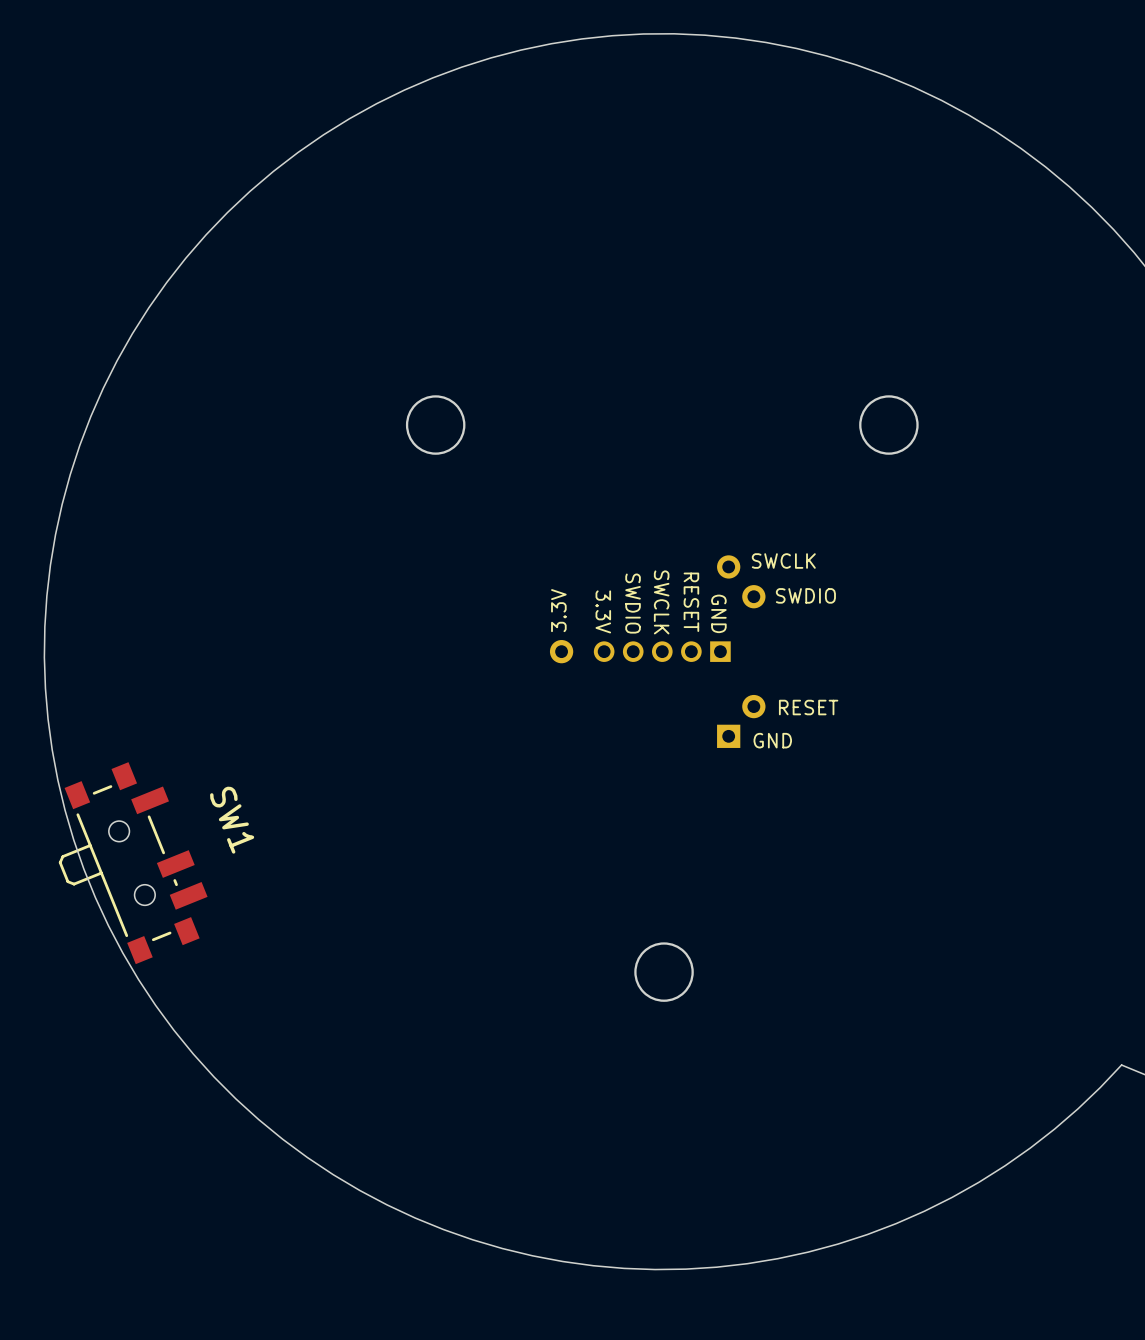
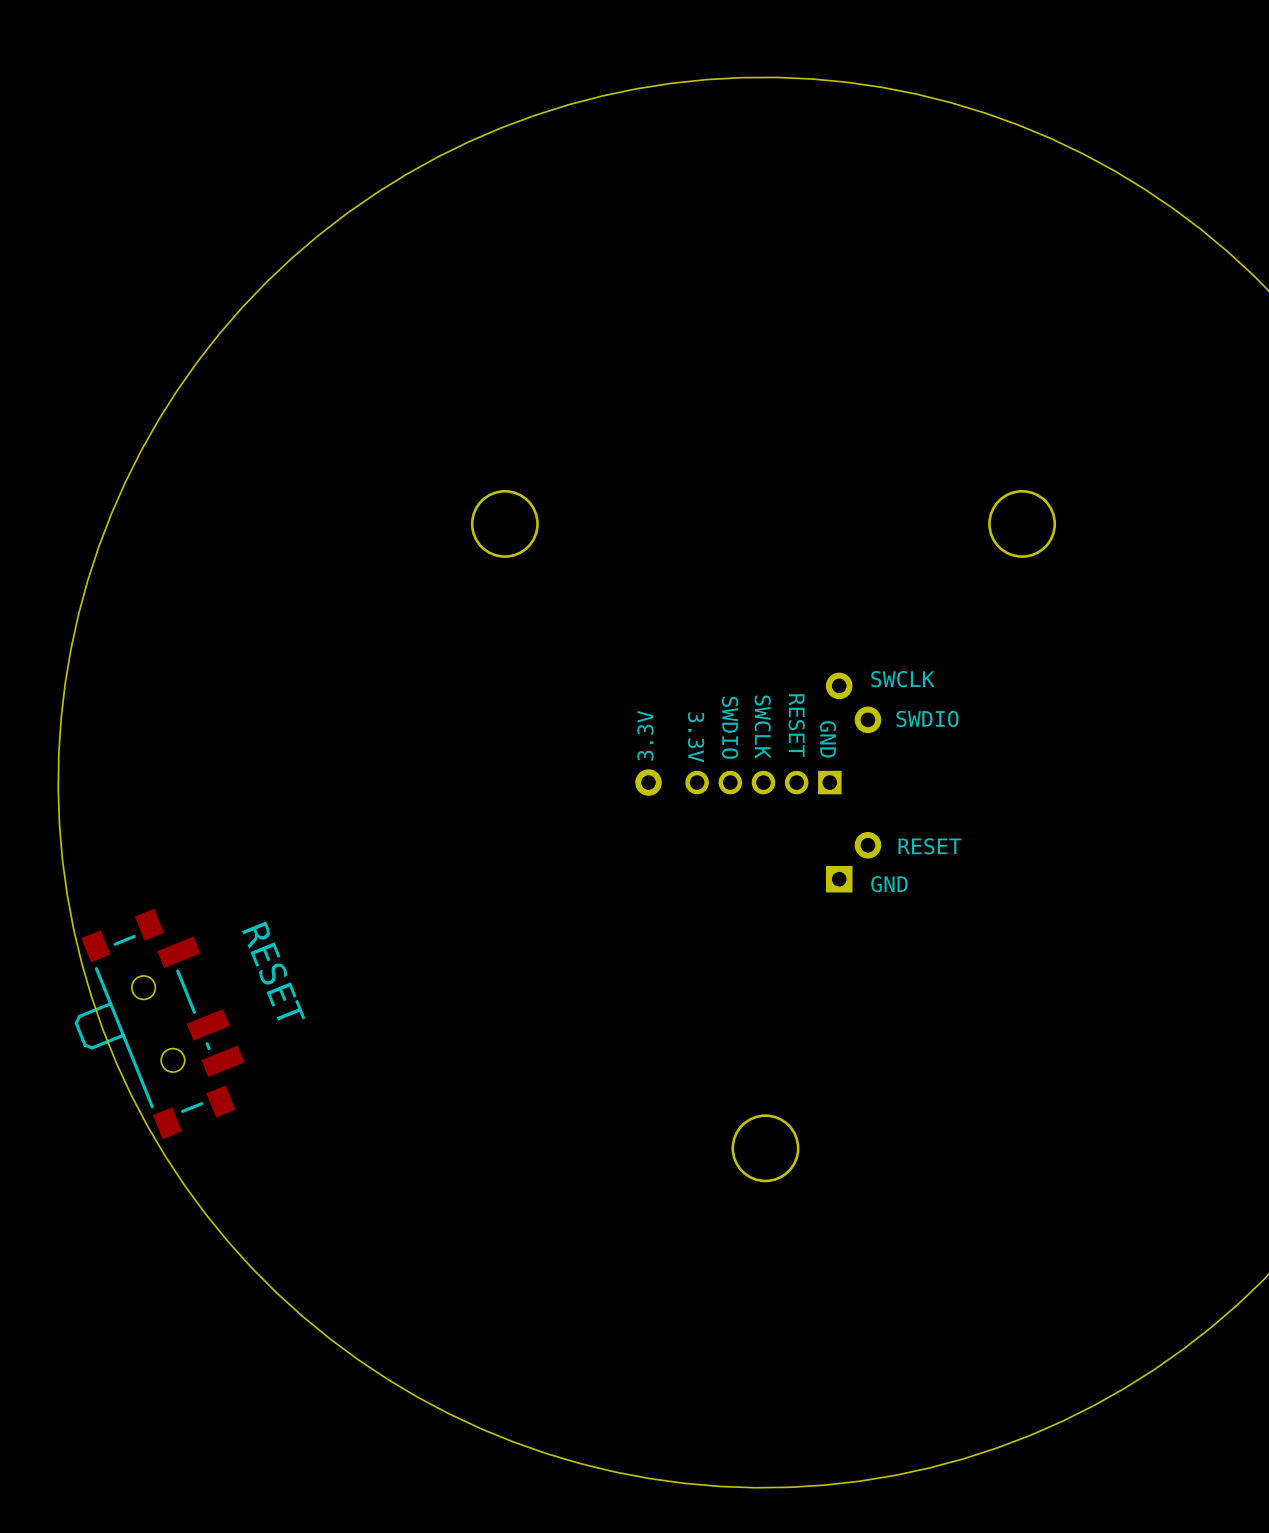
SW1 name: SW1 (232, 820) -> RESET (273, 970)

